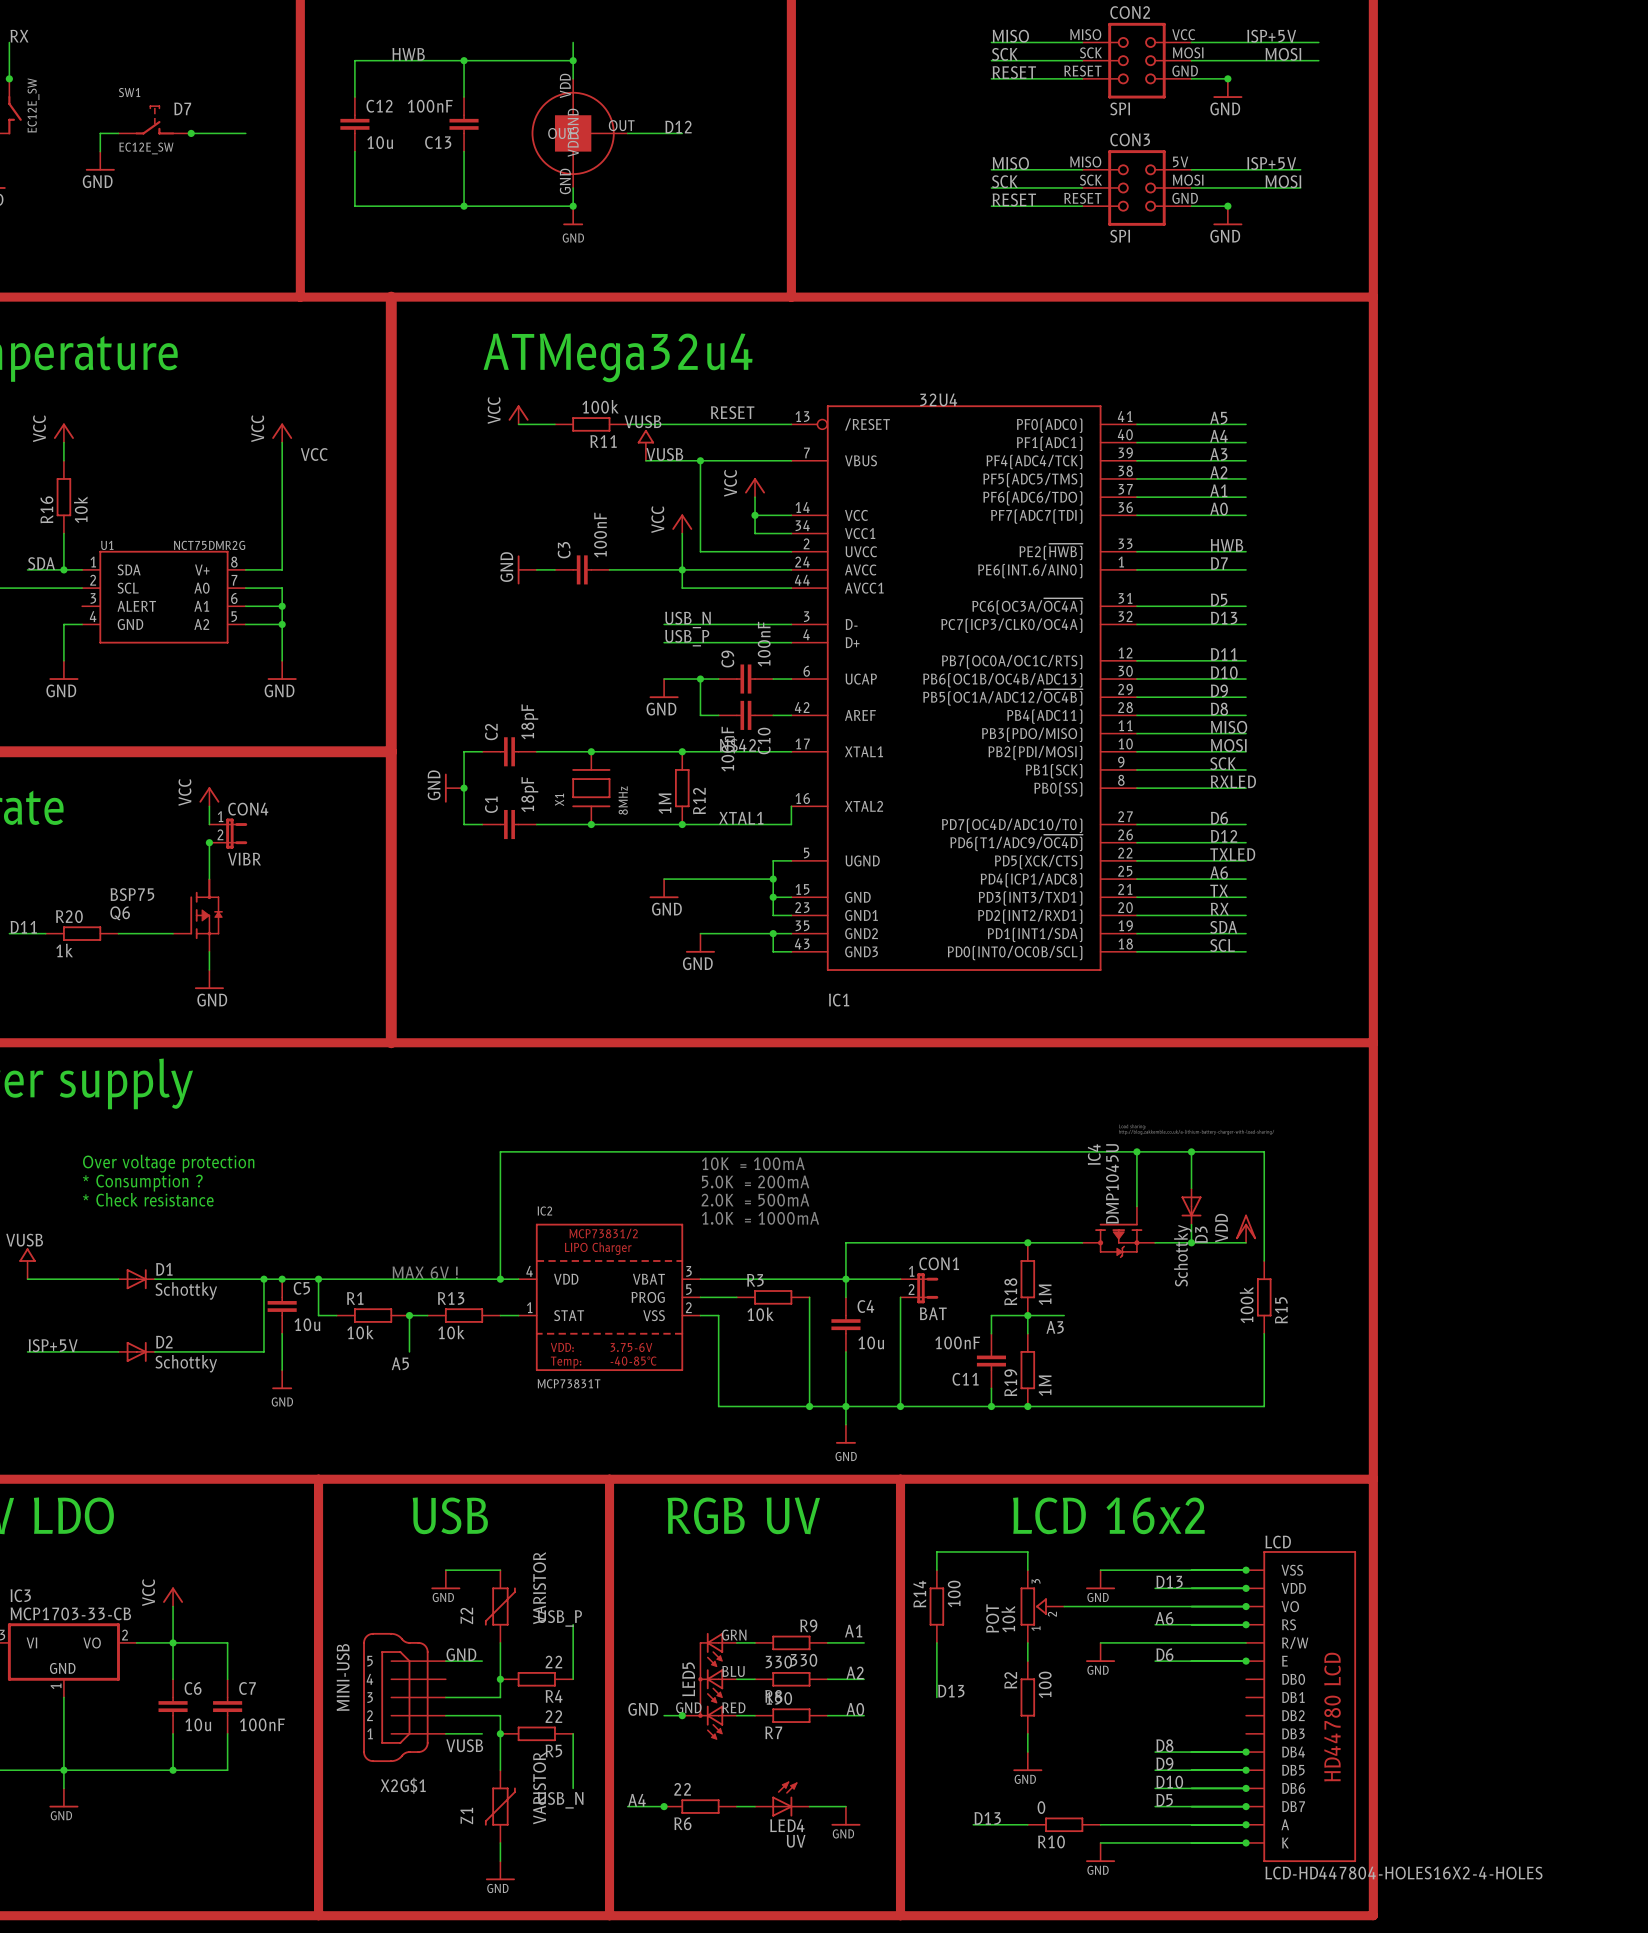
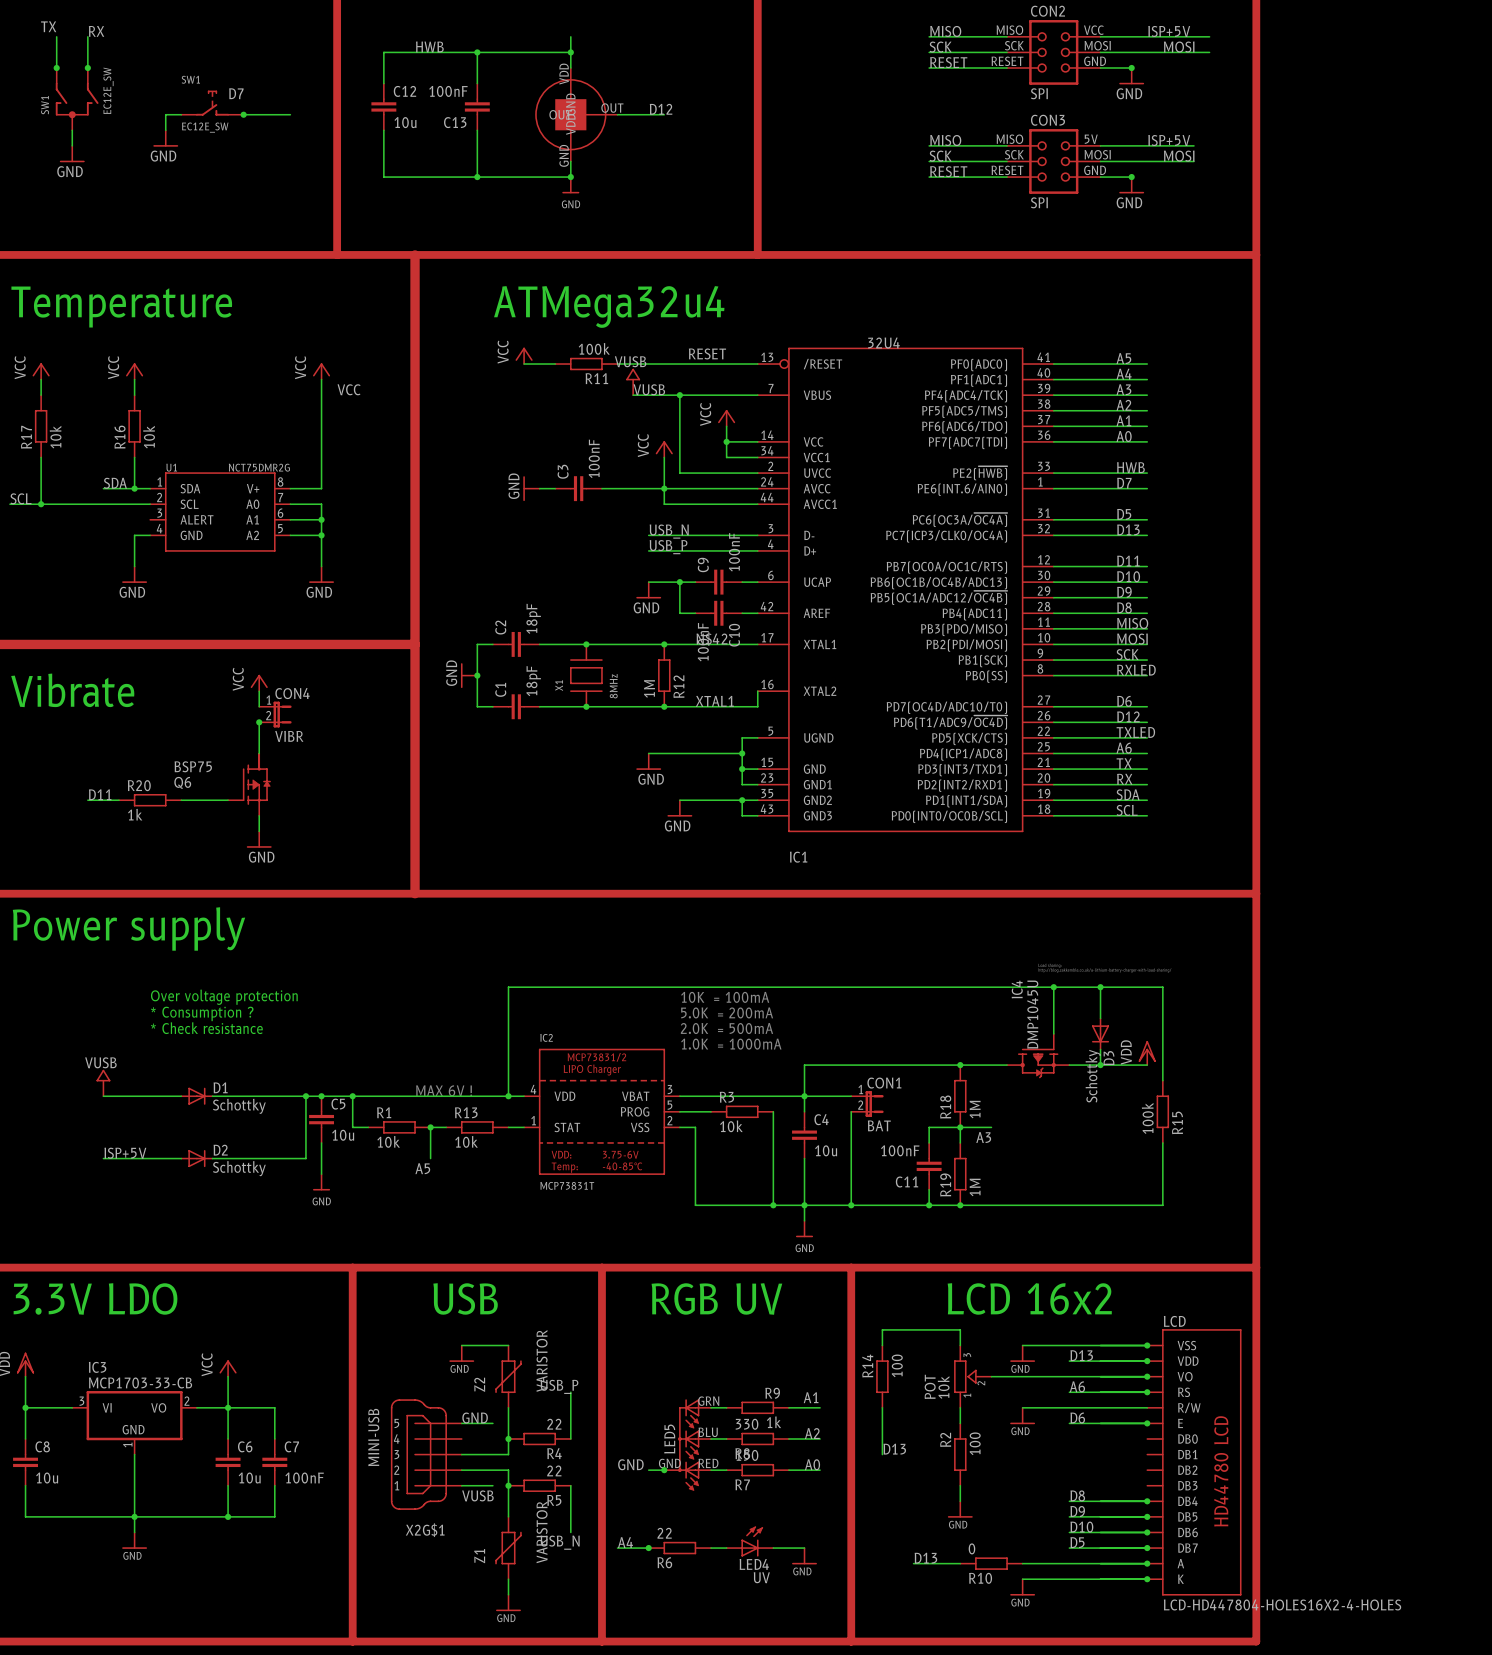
R9 value: 330 (804, 1660) -> 1k (774, 1422)

